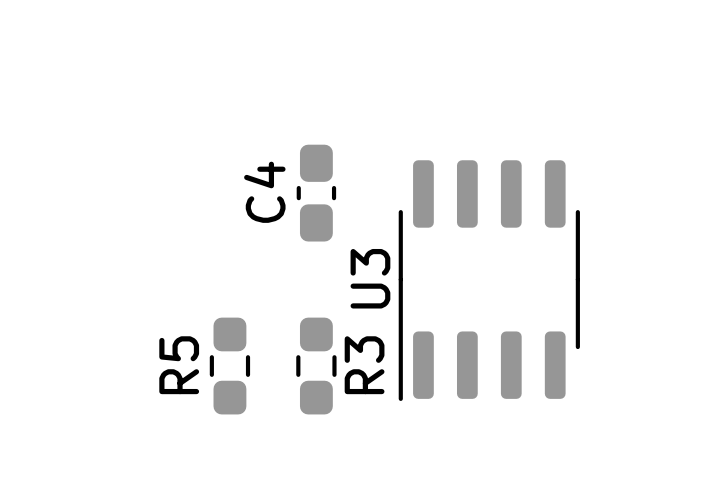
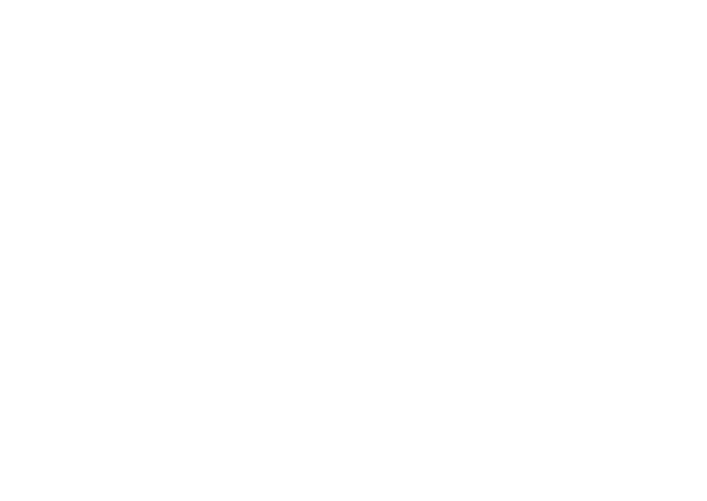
C4: (316, 193) -> none
U3: (489, 280) -> none
R5: (229, 366) -> none
R3: (316, 366) -> none

